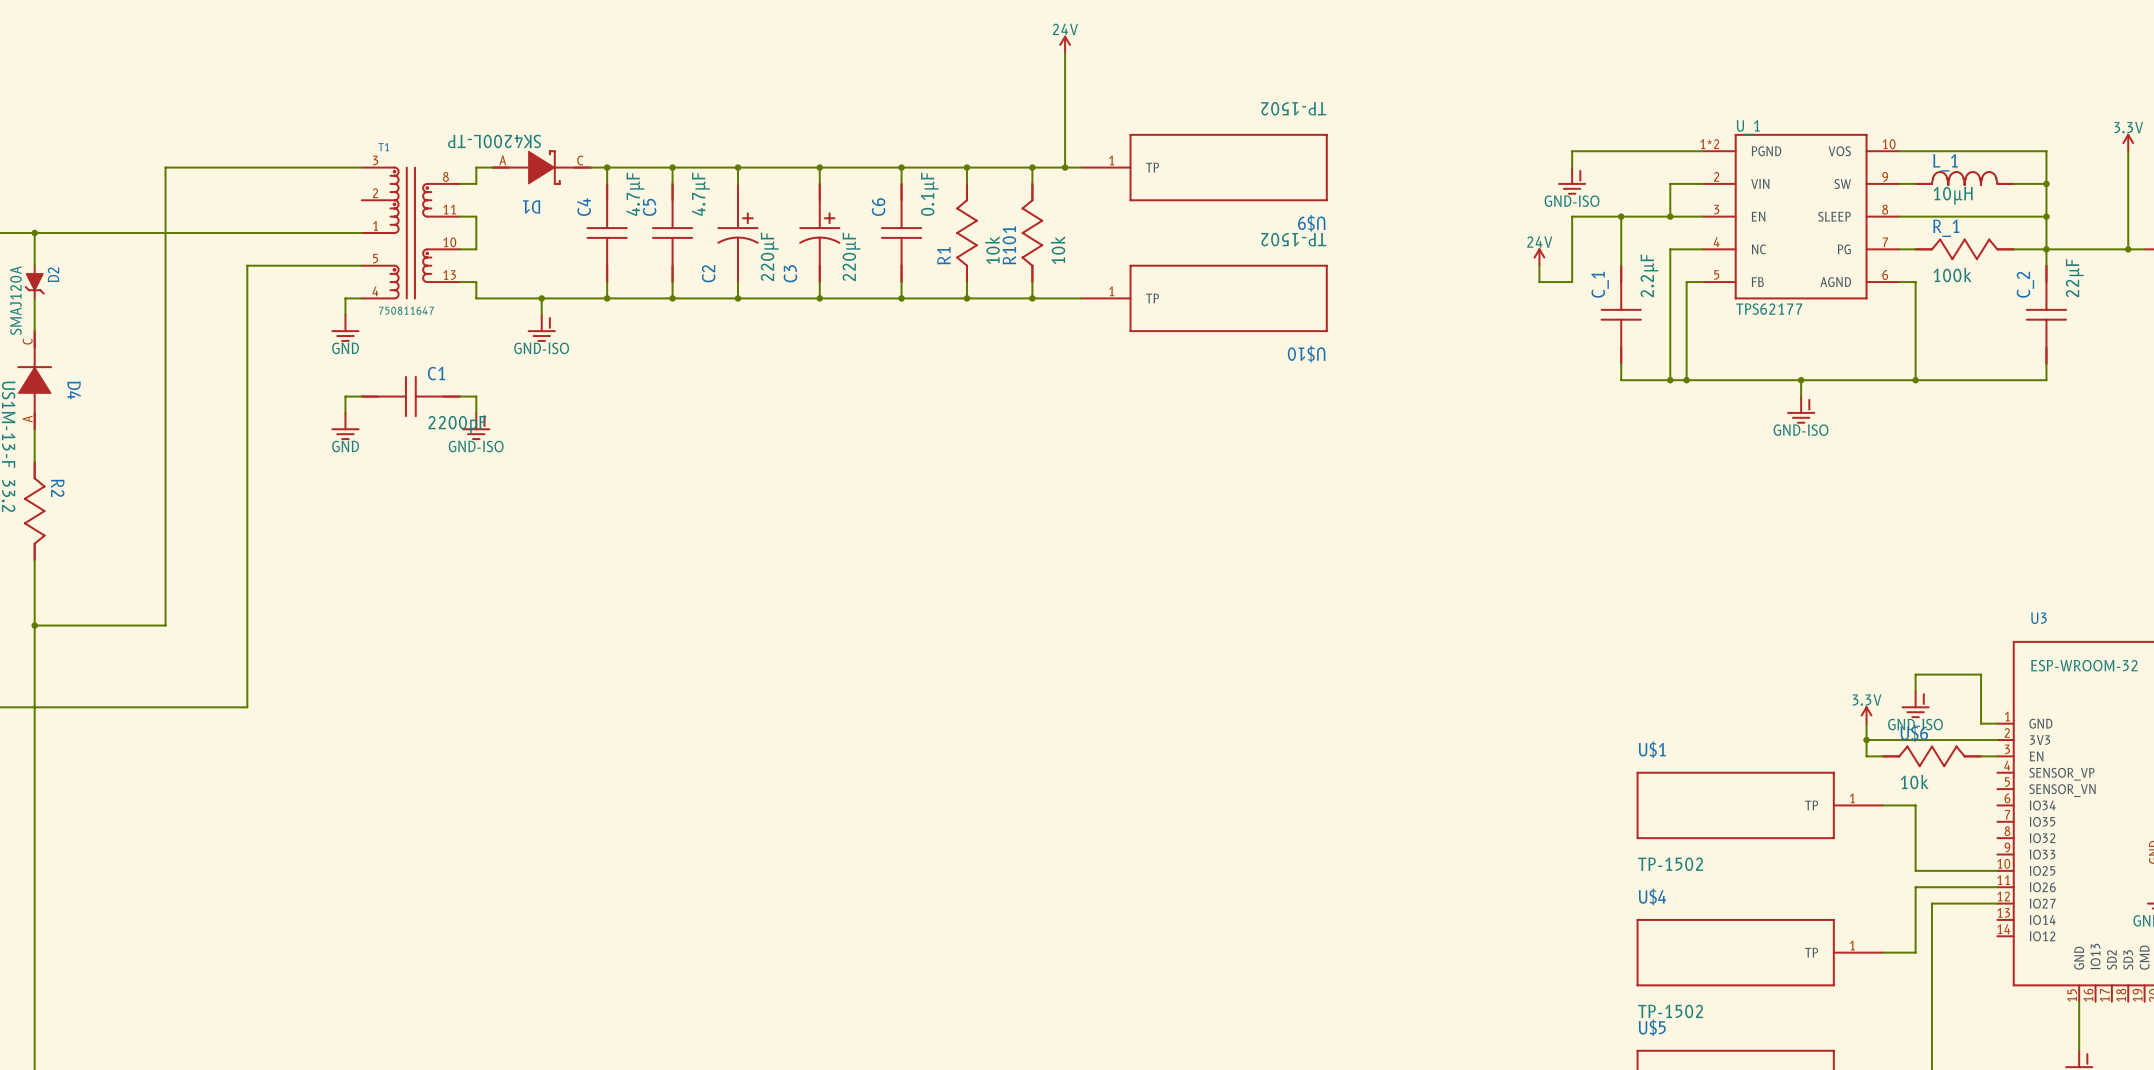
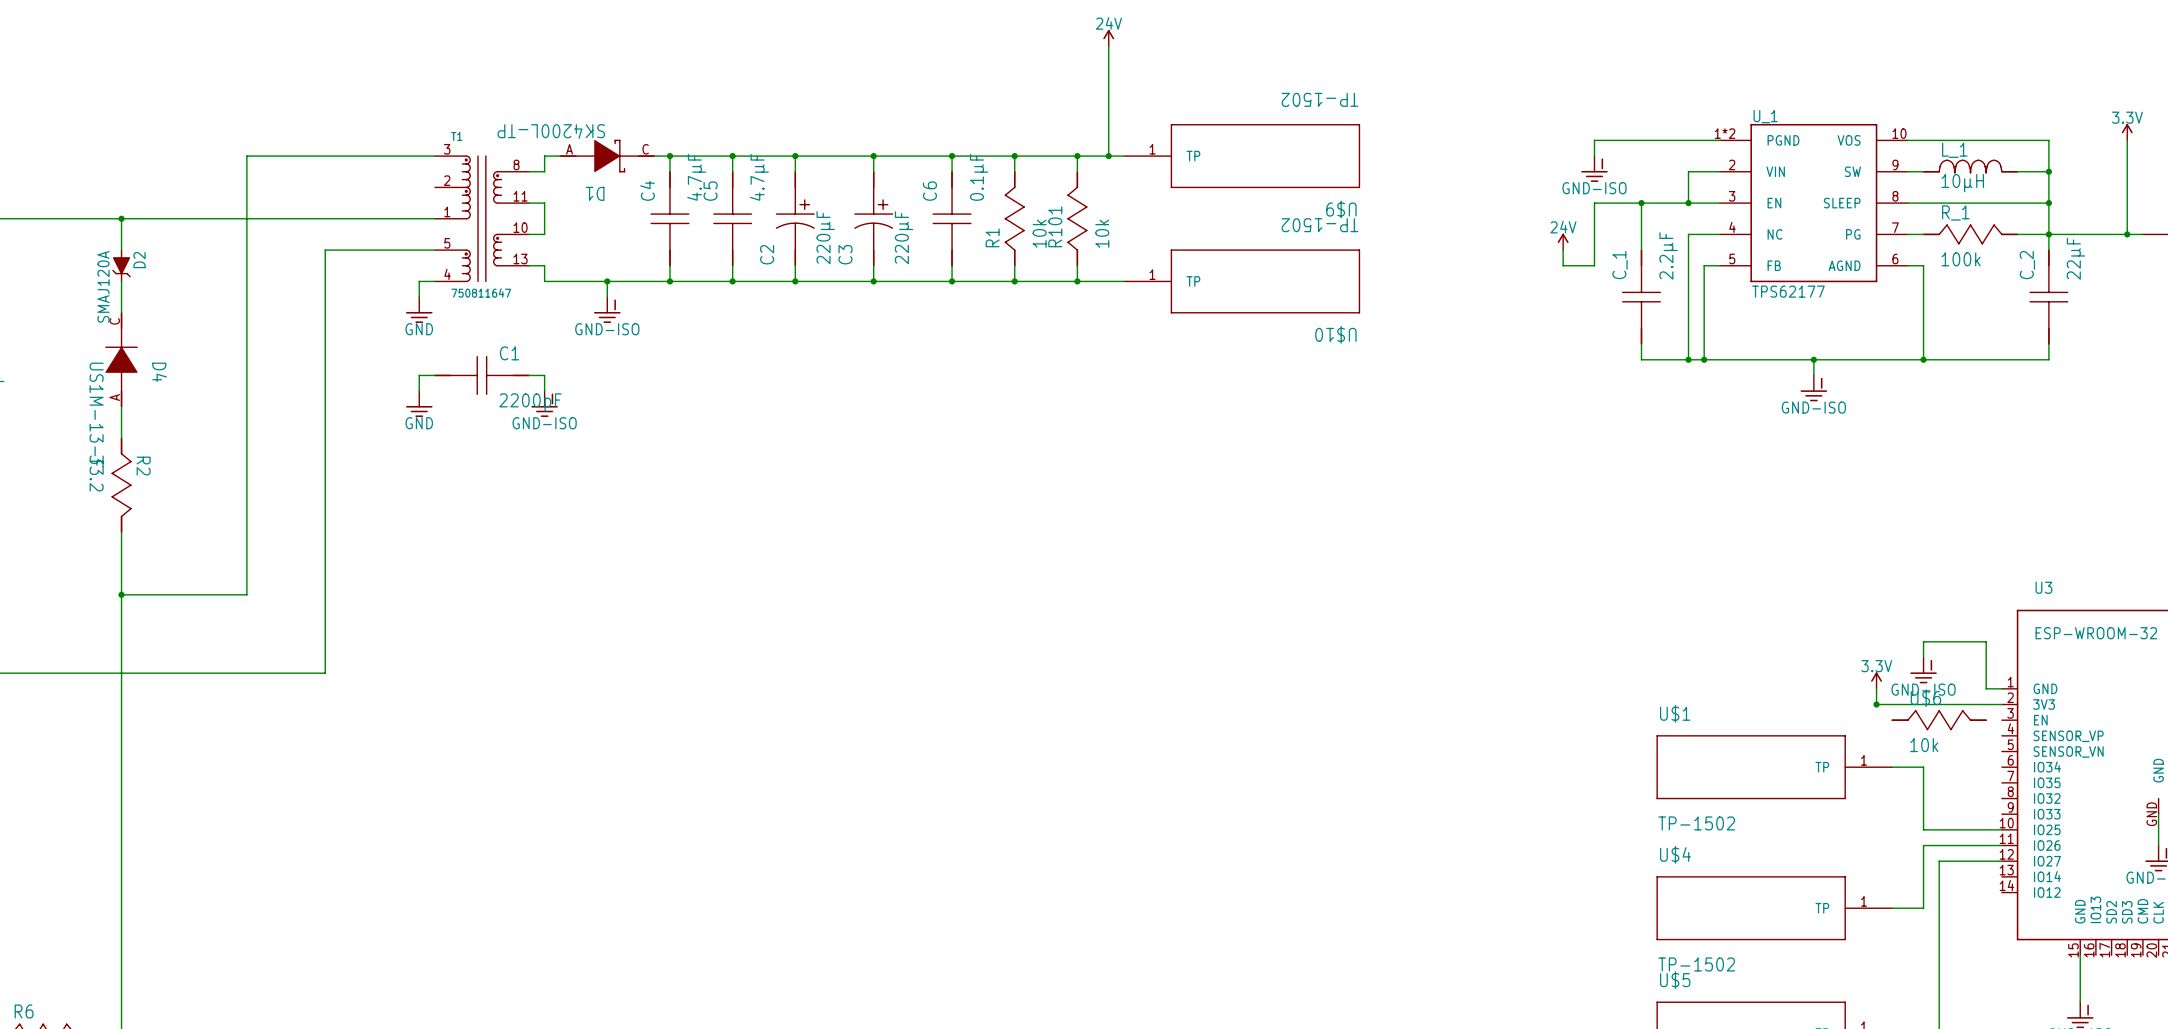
wire: (1866, 740) (1866, 756) (1882, 756) -> none
wire: (1981, 756) (1997, 756) -> none

